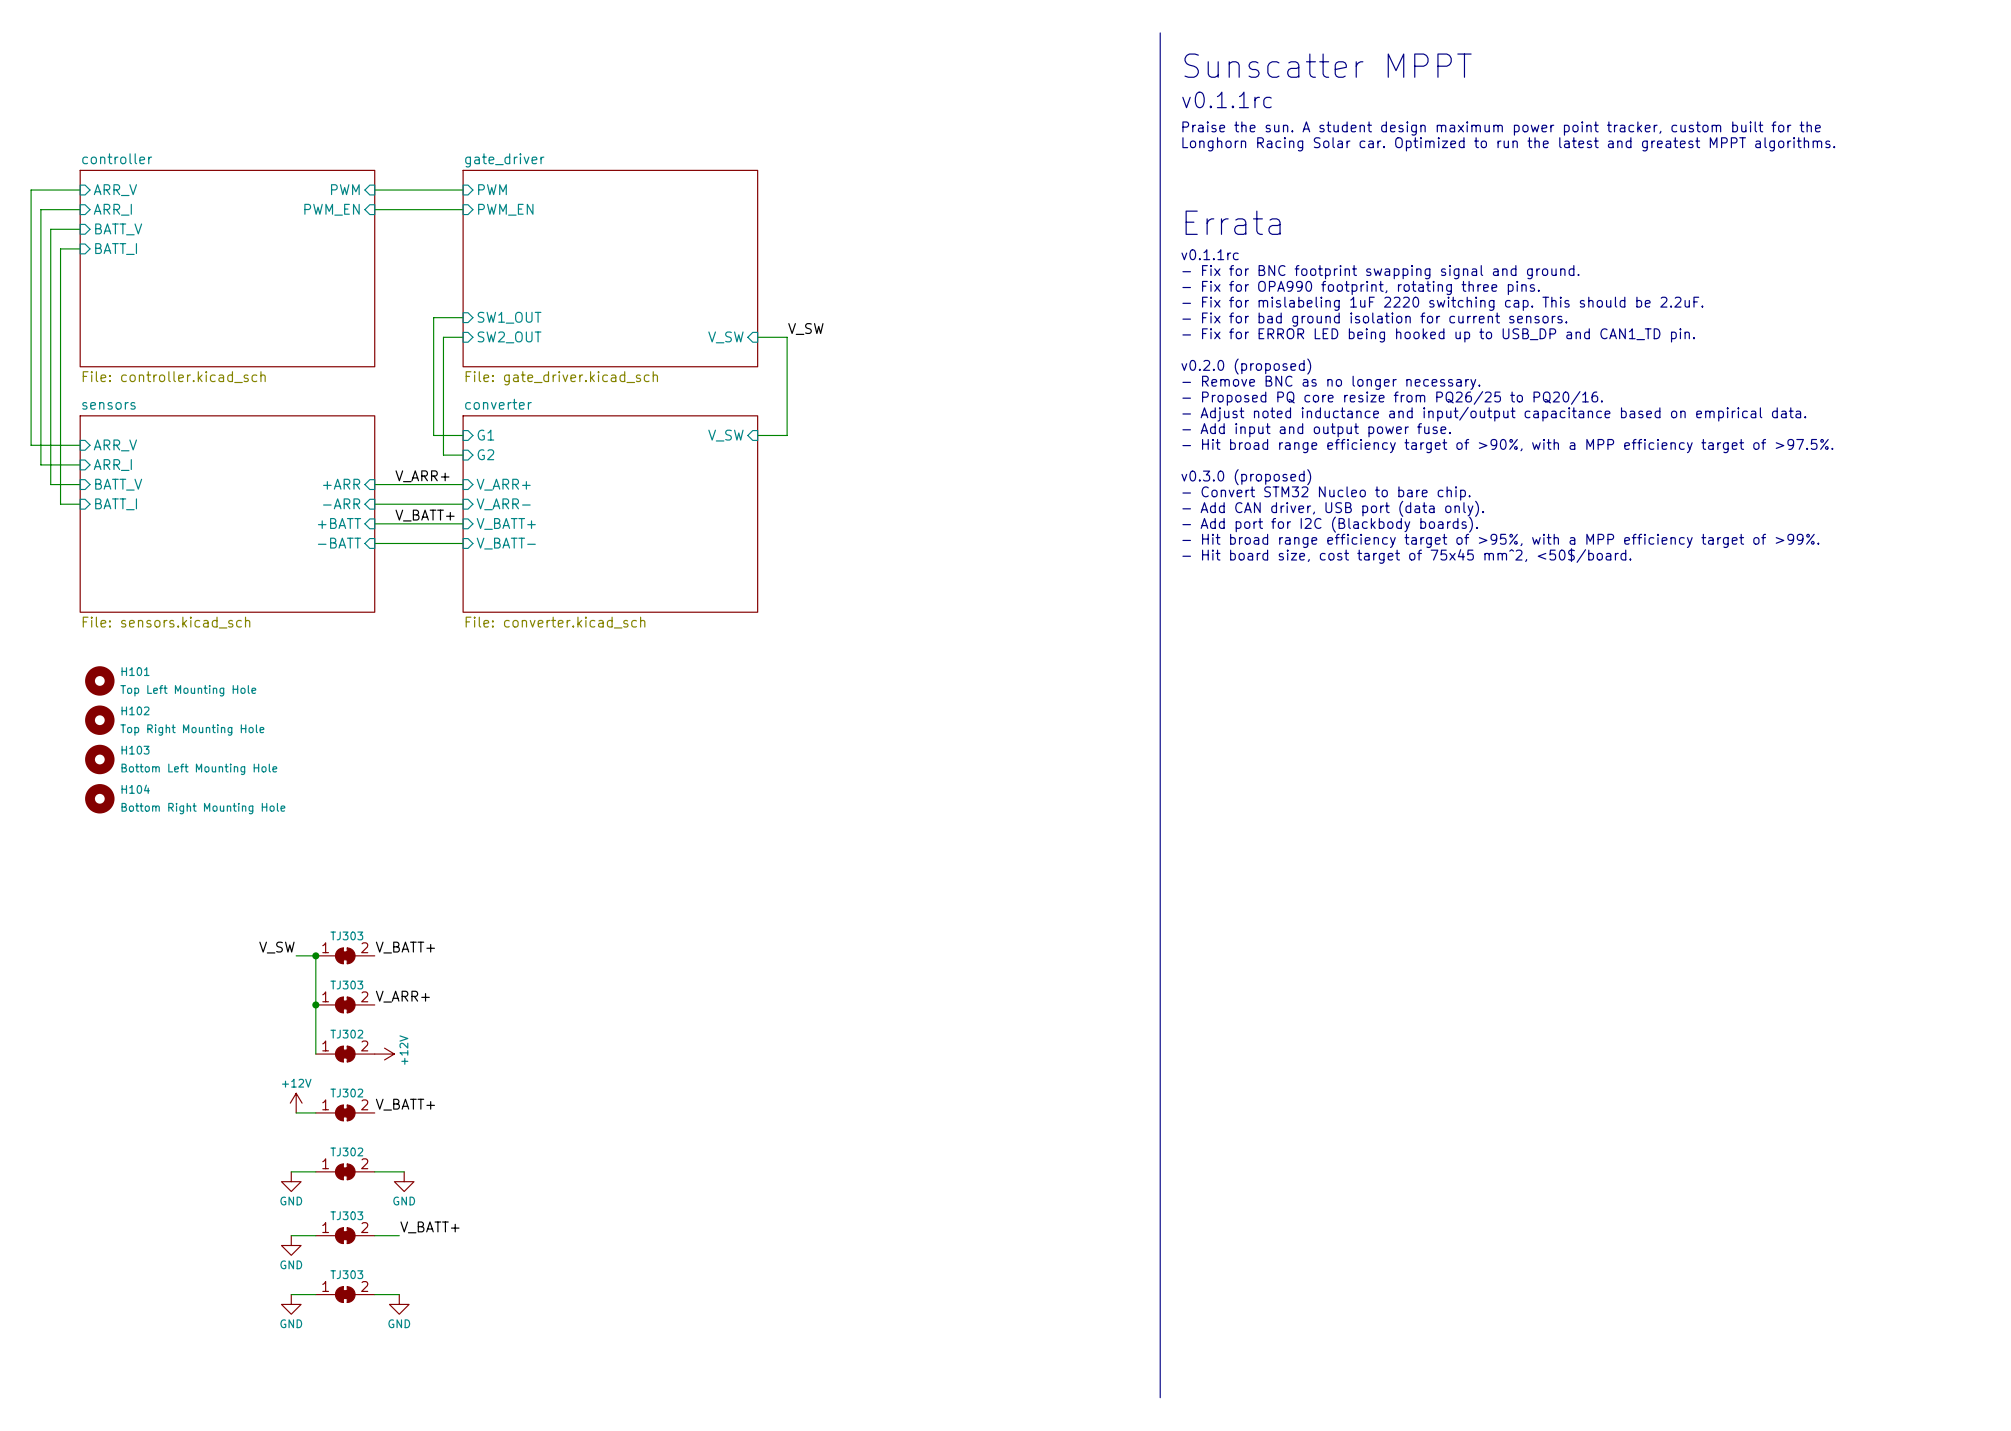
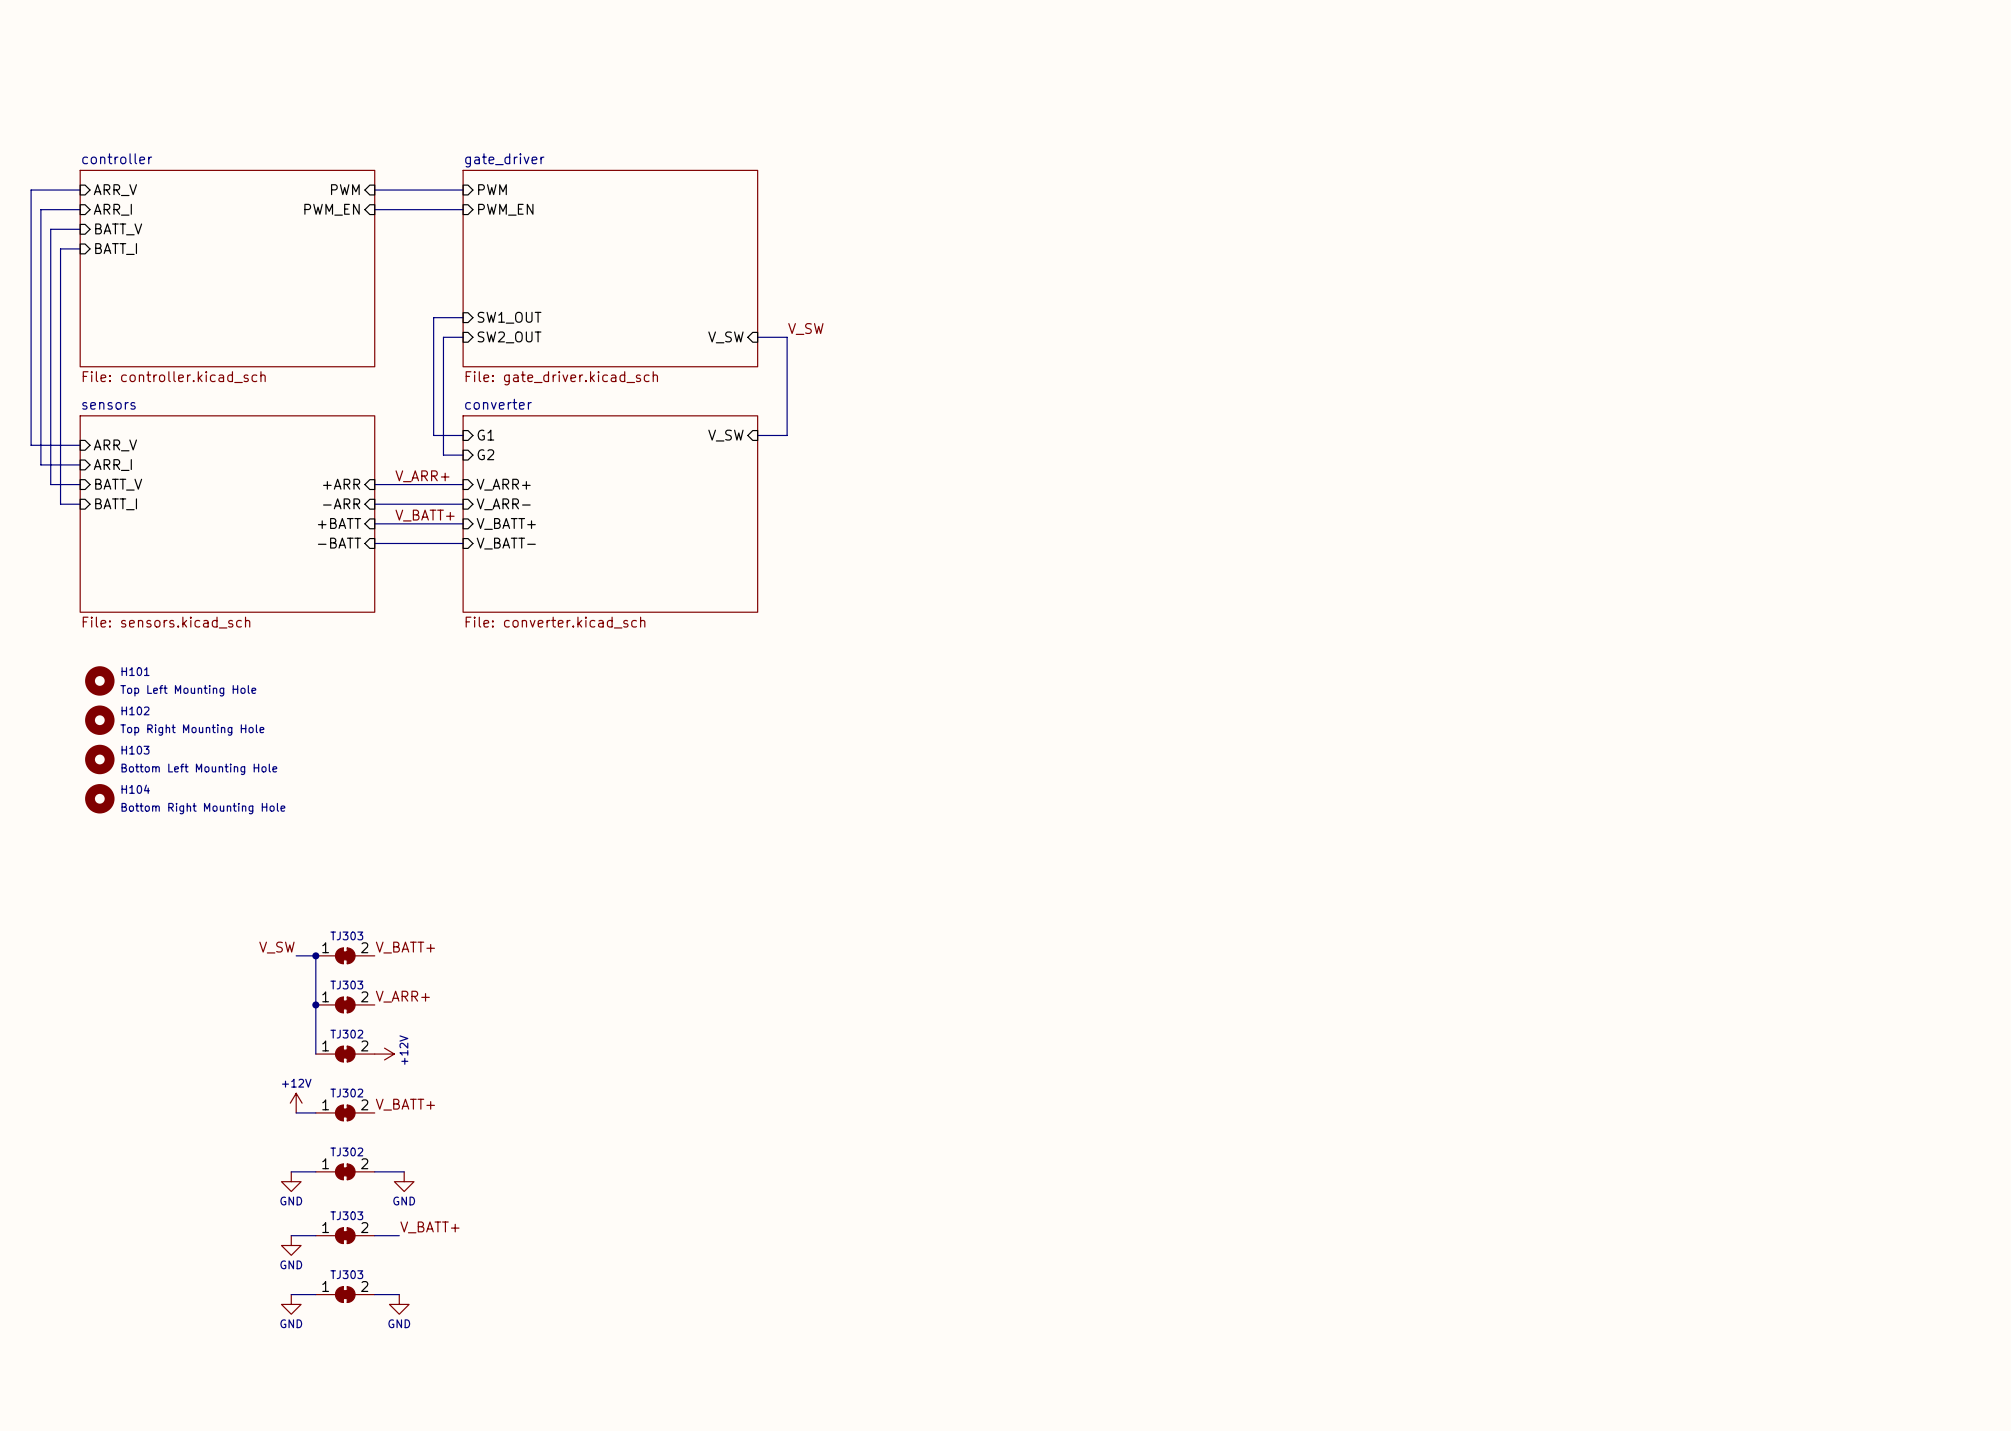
line: (1160, 32) (1160, 1397) -> none
text: Sunscatter MPPT (1328, 65) -> none
text: v0.1.1rc (1227, 99) -> none
text: Praise the sun. A student design maximum power point tracker, custom built for the (1501, 128) -> none
text: Longhorn Racing Solar car. Optimized to run the latest and greatest MPPT algorithms. (1508, 144) -> none
text: Errata (1233, 222) -> none
text: v0.1.1rc (1210, 254) -> none
text: - Fix for BNC footprint swapping signal and ground. (1380, 272) -> none
text: - Fix for OPA990 footprint, rotating three pins. (1361, 287) -> none
text: - Fix for mislabeling 1uF 2220 switching cap. This should be 2.2uF. (1442, 303) -> none
text: - Fix for bad ground isolation for current sensors. (1374, 319) -> none
text: - Fix for ERROR LED being hooked up to USB_DP and CAN1_TD pin. (1438, 335) -> none
text: v0.2.0 (proposed) (1246, 366) -> none
text: - Remove BNC as no longer necessary. (1331, 382) -> none
text: - Proposed PQ core resize from PQ26/25 to PQ20/16. (1392, 398) -> none
text: - Adjust noted inductance and input/output capacitance based on empirical data. (1494, 414) -> none
text: - Add input and output power fuse. (1316, 430) -> none
text: - Hit broad range efficiency target of >90%, with a MPP efficiency target of >97.5%. (1507, 446) -> none
text: v0.3.0 (proposed) (1246, 477) -> none
text: - Convert STM32 Nucleo to bare chip. (1326, 493) -> none
text: - Add CAN driver, USB port (data only). (1333, 508) -> none
text: - Add port for I2C (Blackbody boards). (1330, 524) -> none
text: - Hit broad range efficiency target of >95%, with a MPP efficiency target of >99%. (1500, 540) -> none
text: - Hit board size, cost target of 75x45 mm^2, <50$/board. (1406, 556) -> none

